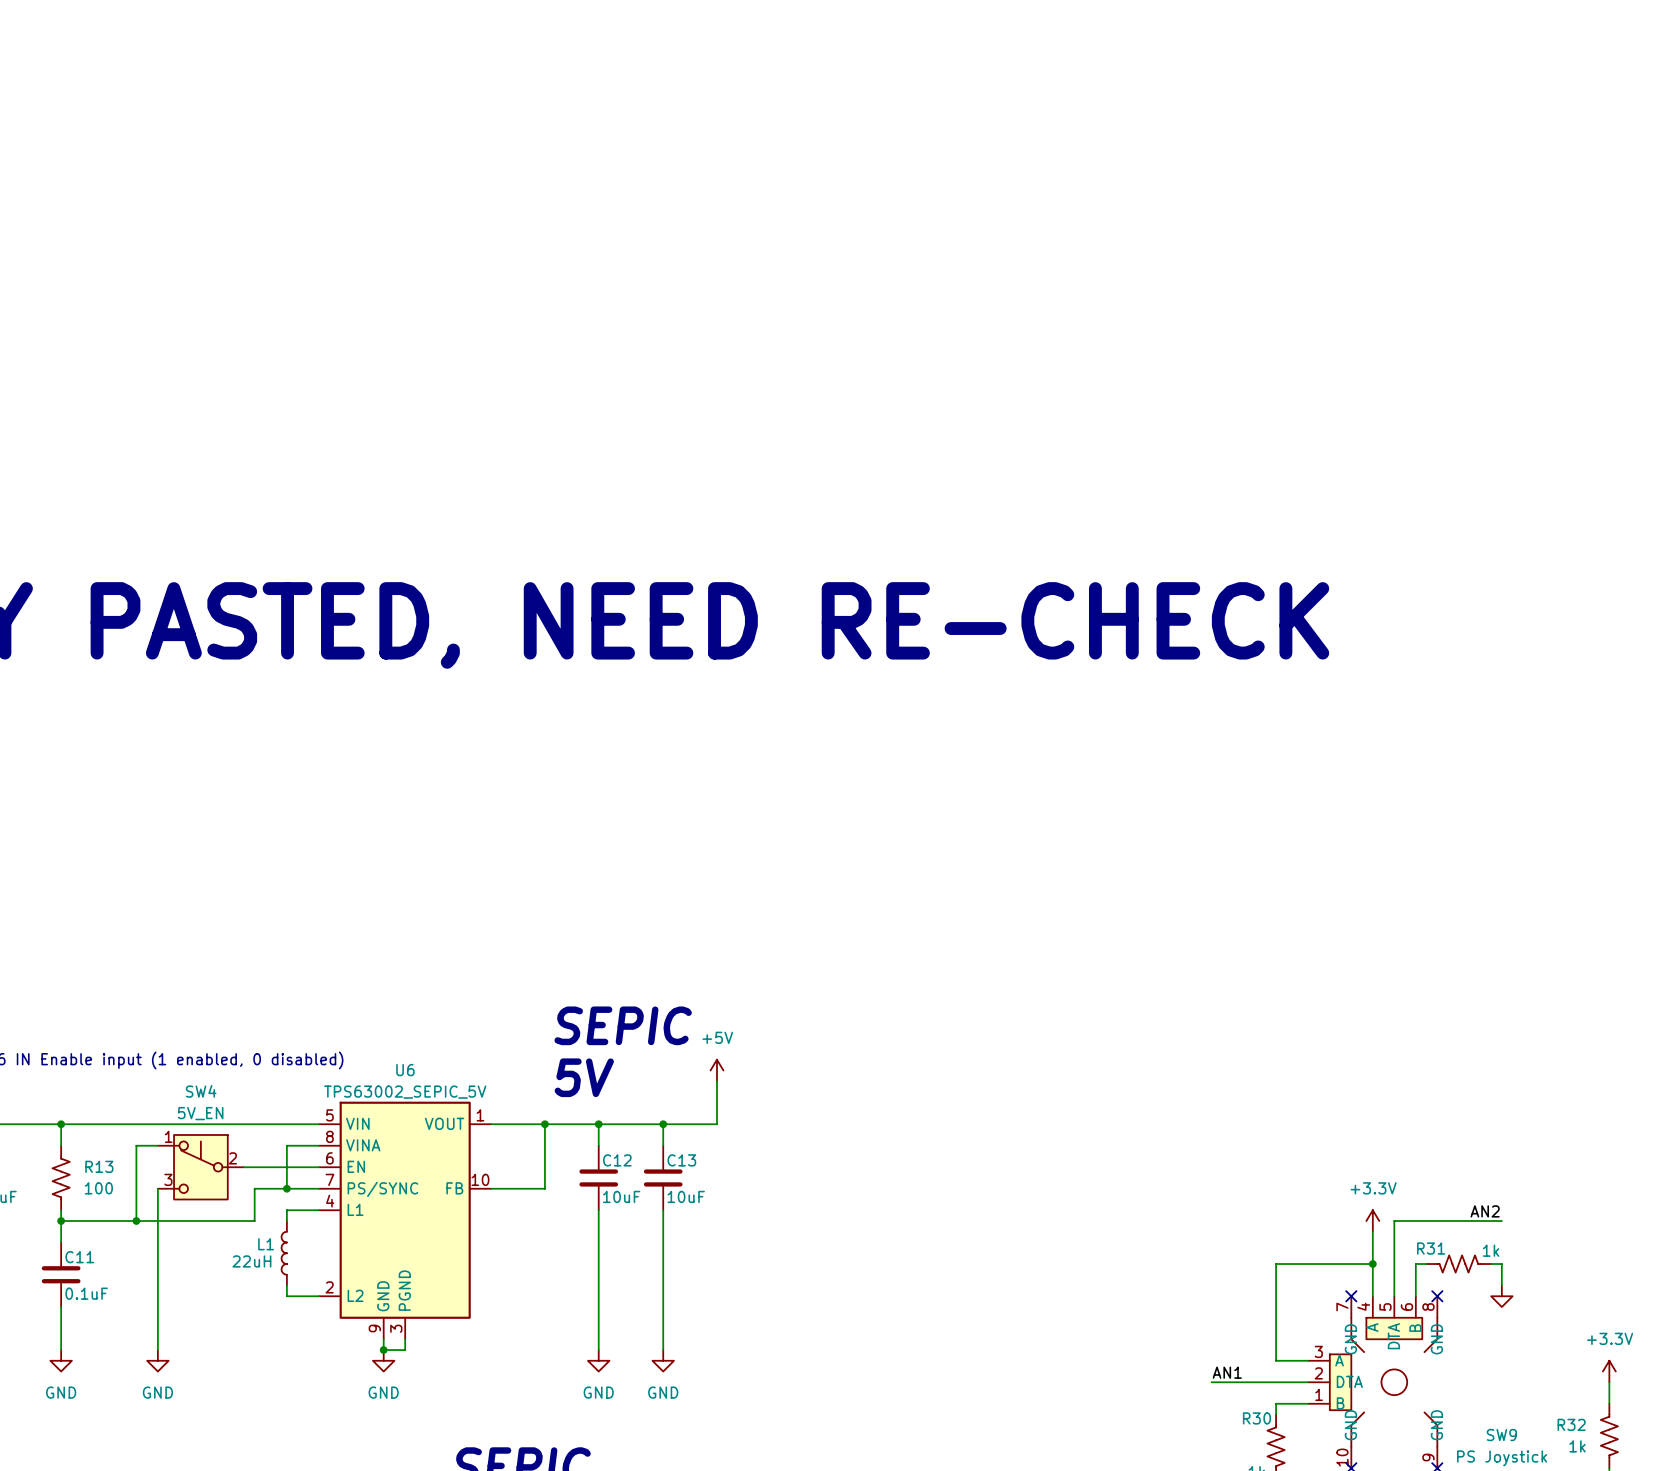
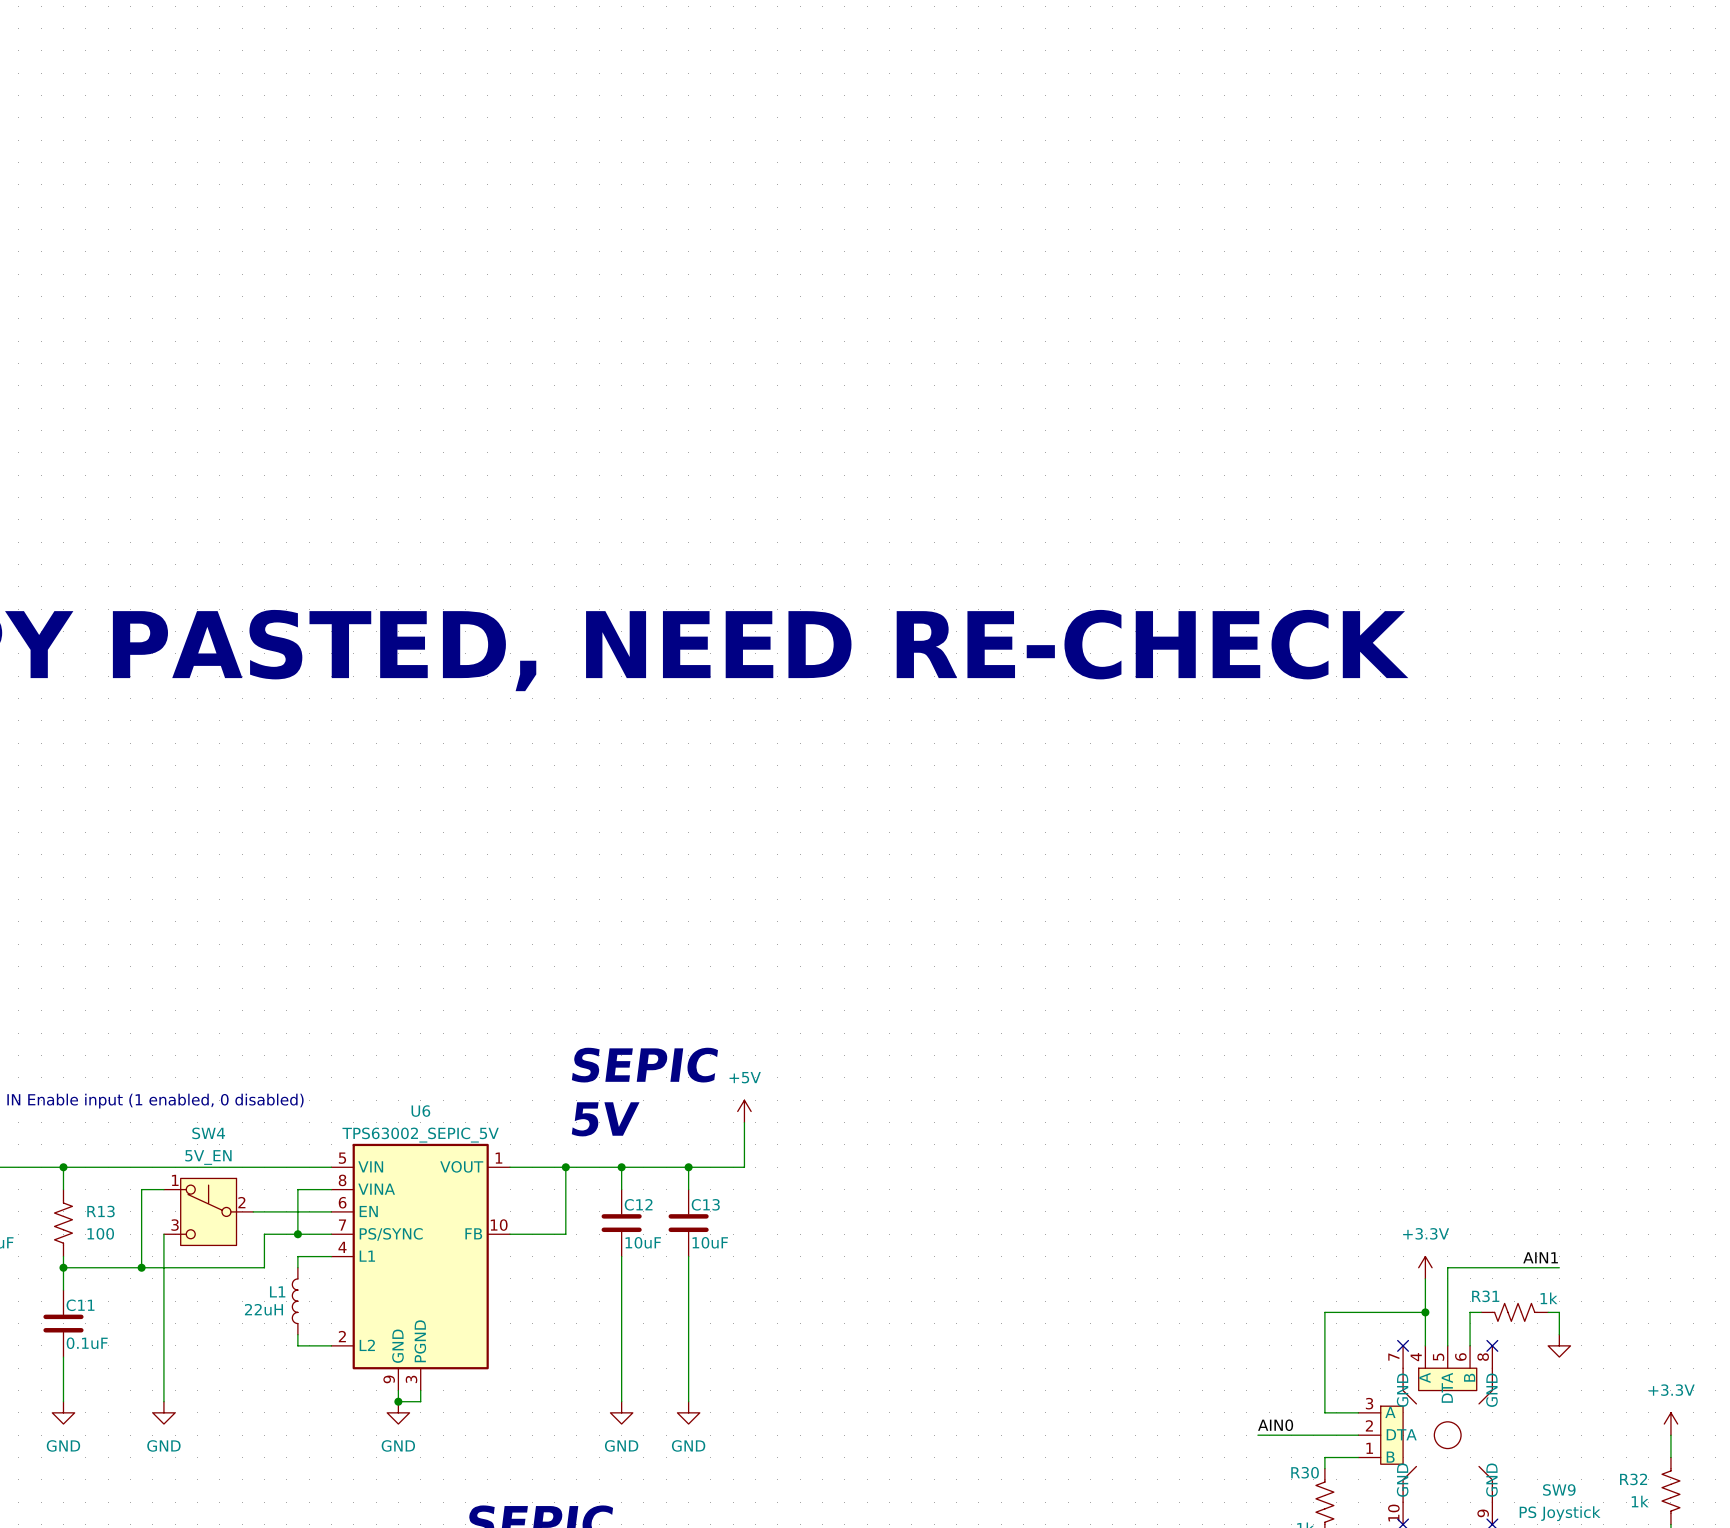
label: AN2 (1485, 1211) -> AIN1 (1540, 1257)
label: AN1 (1227, 1372) -> AIN0 (1275, 1425)

